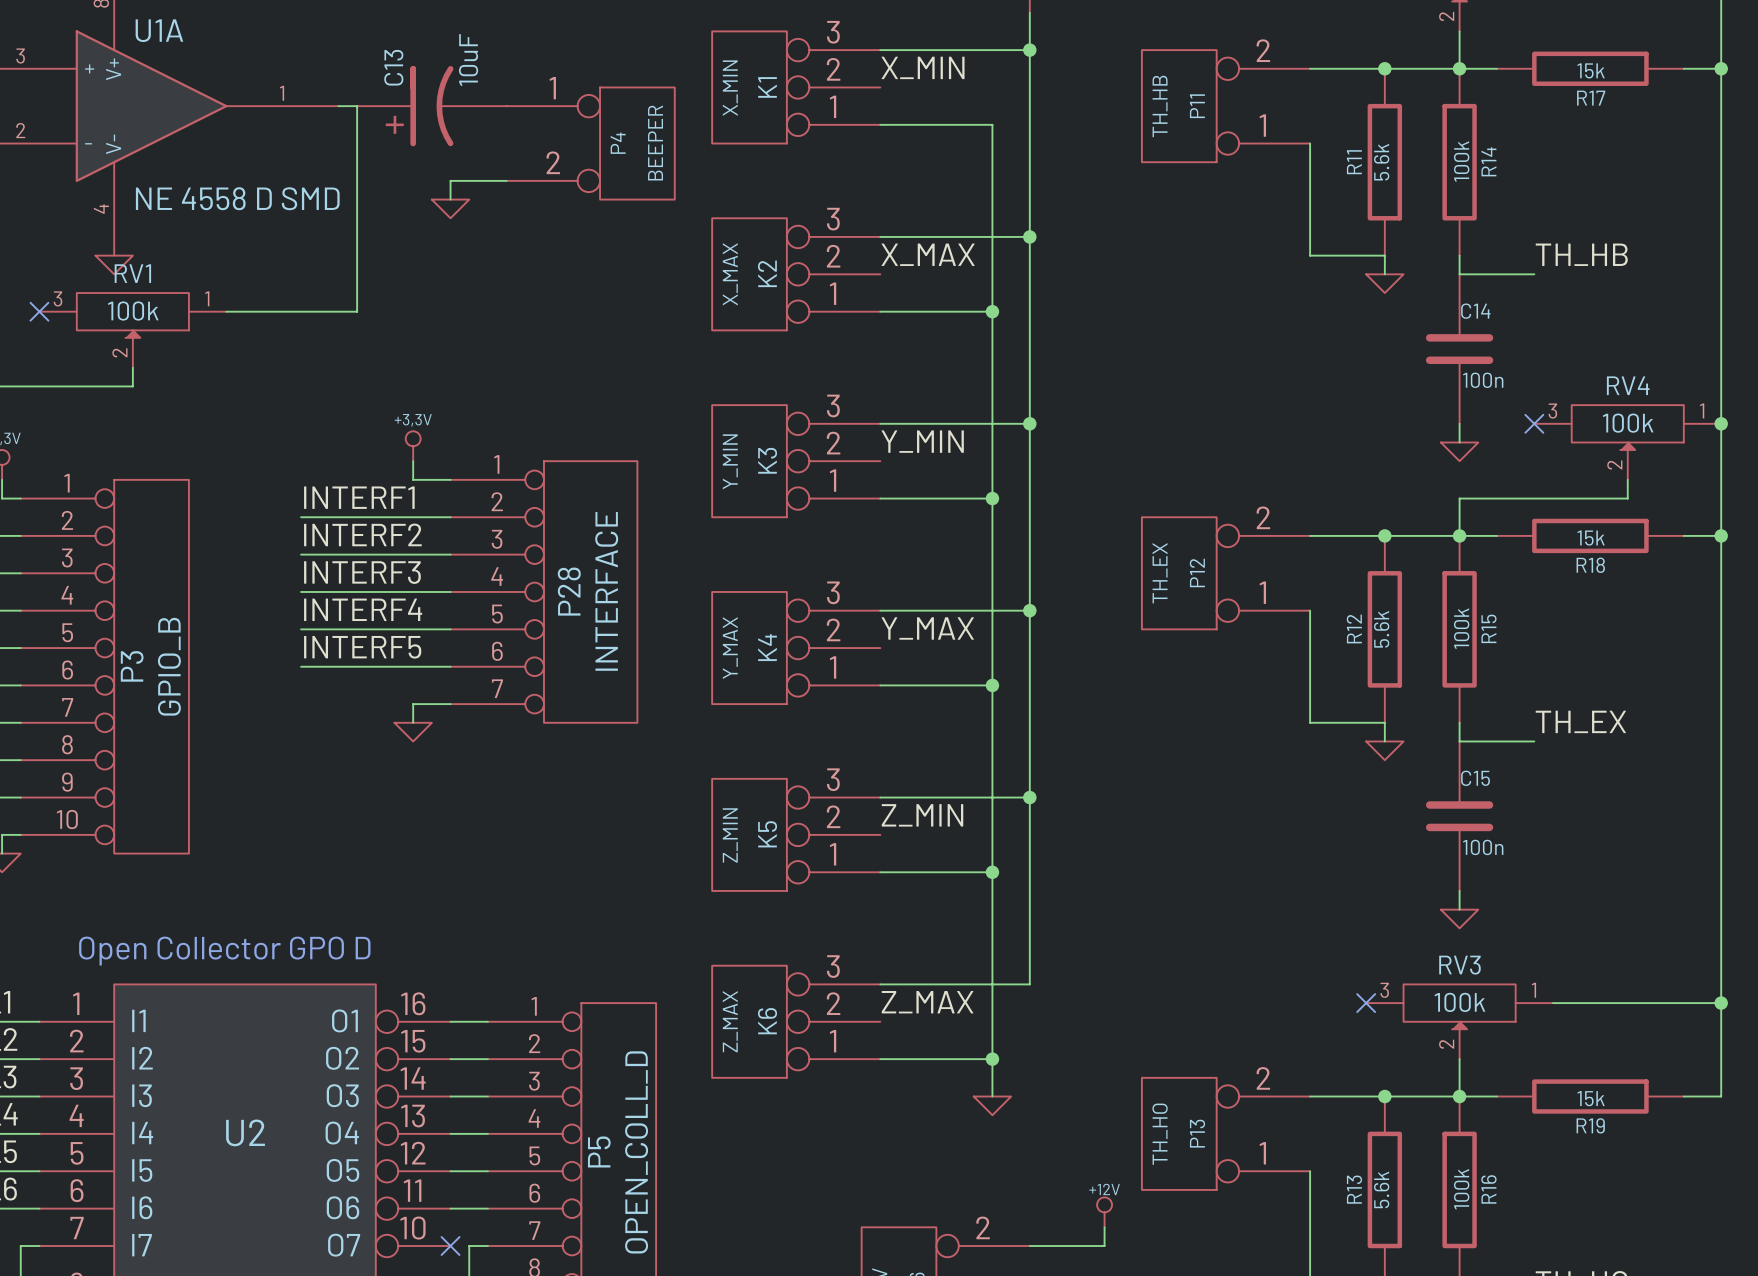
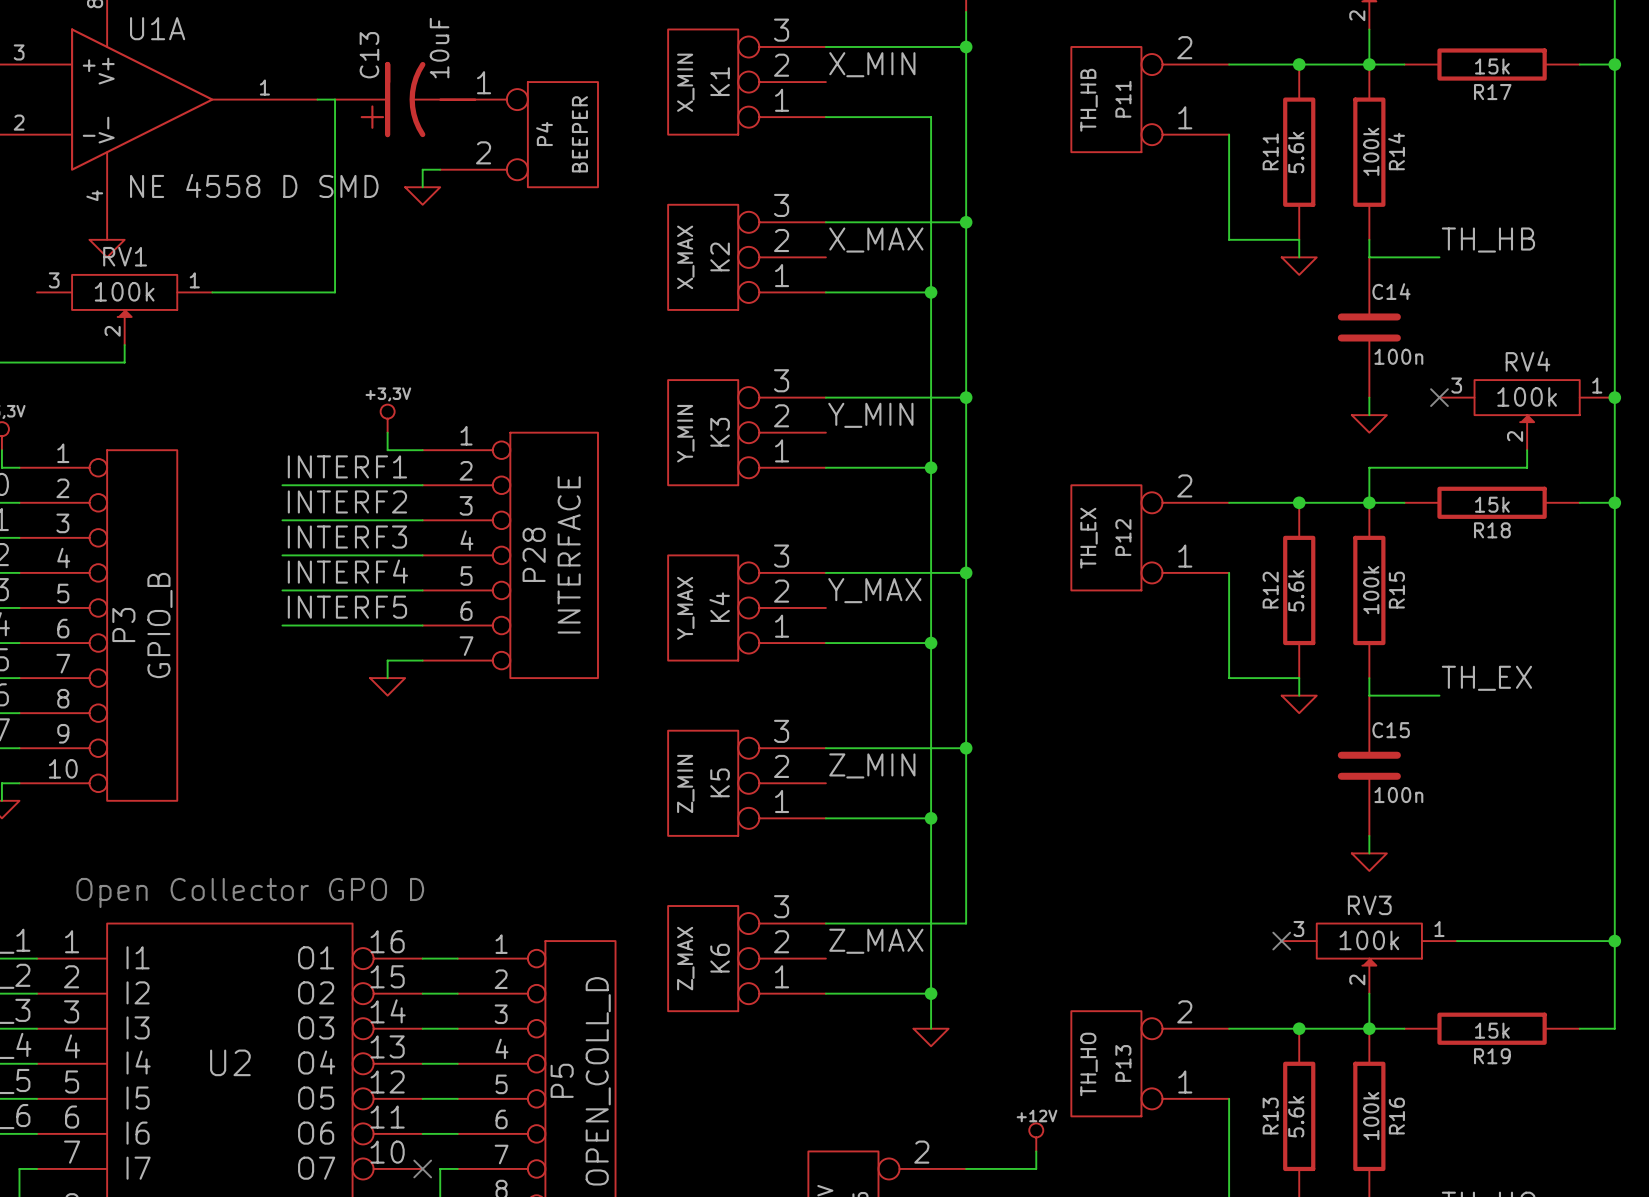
P4 position: (590, 143) -> (519, 134)
no-connect mark: (39, 311) -> none

